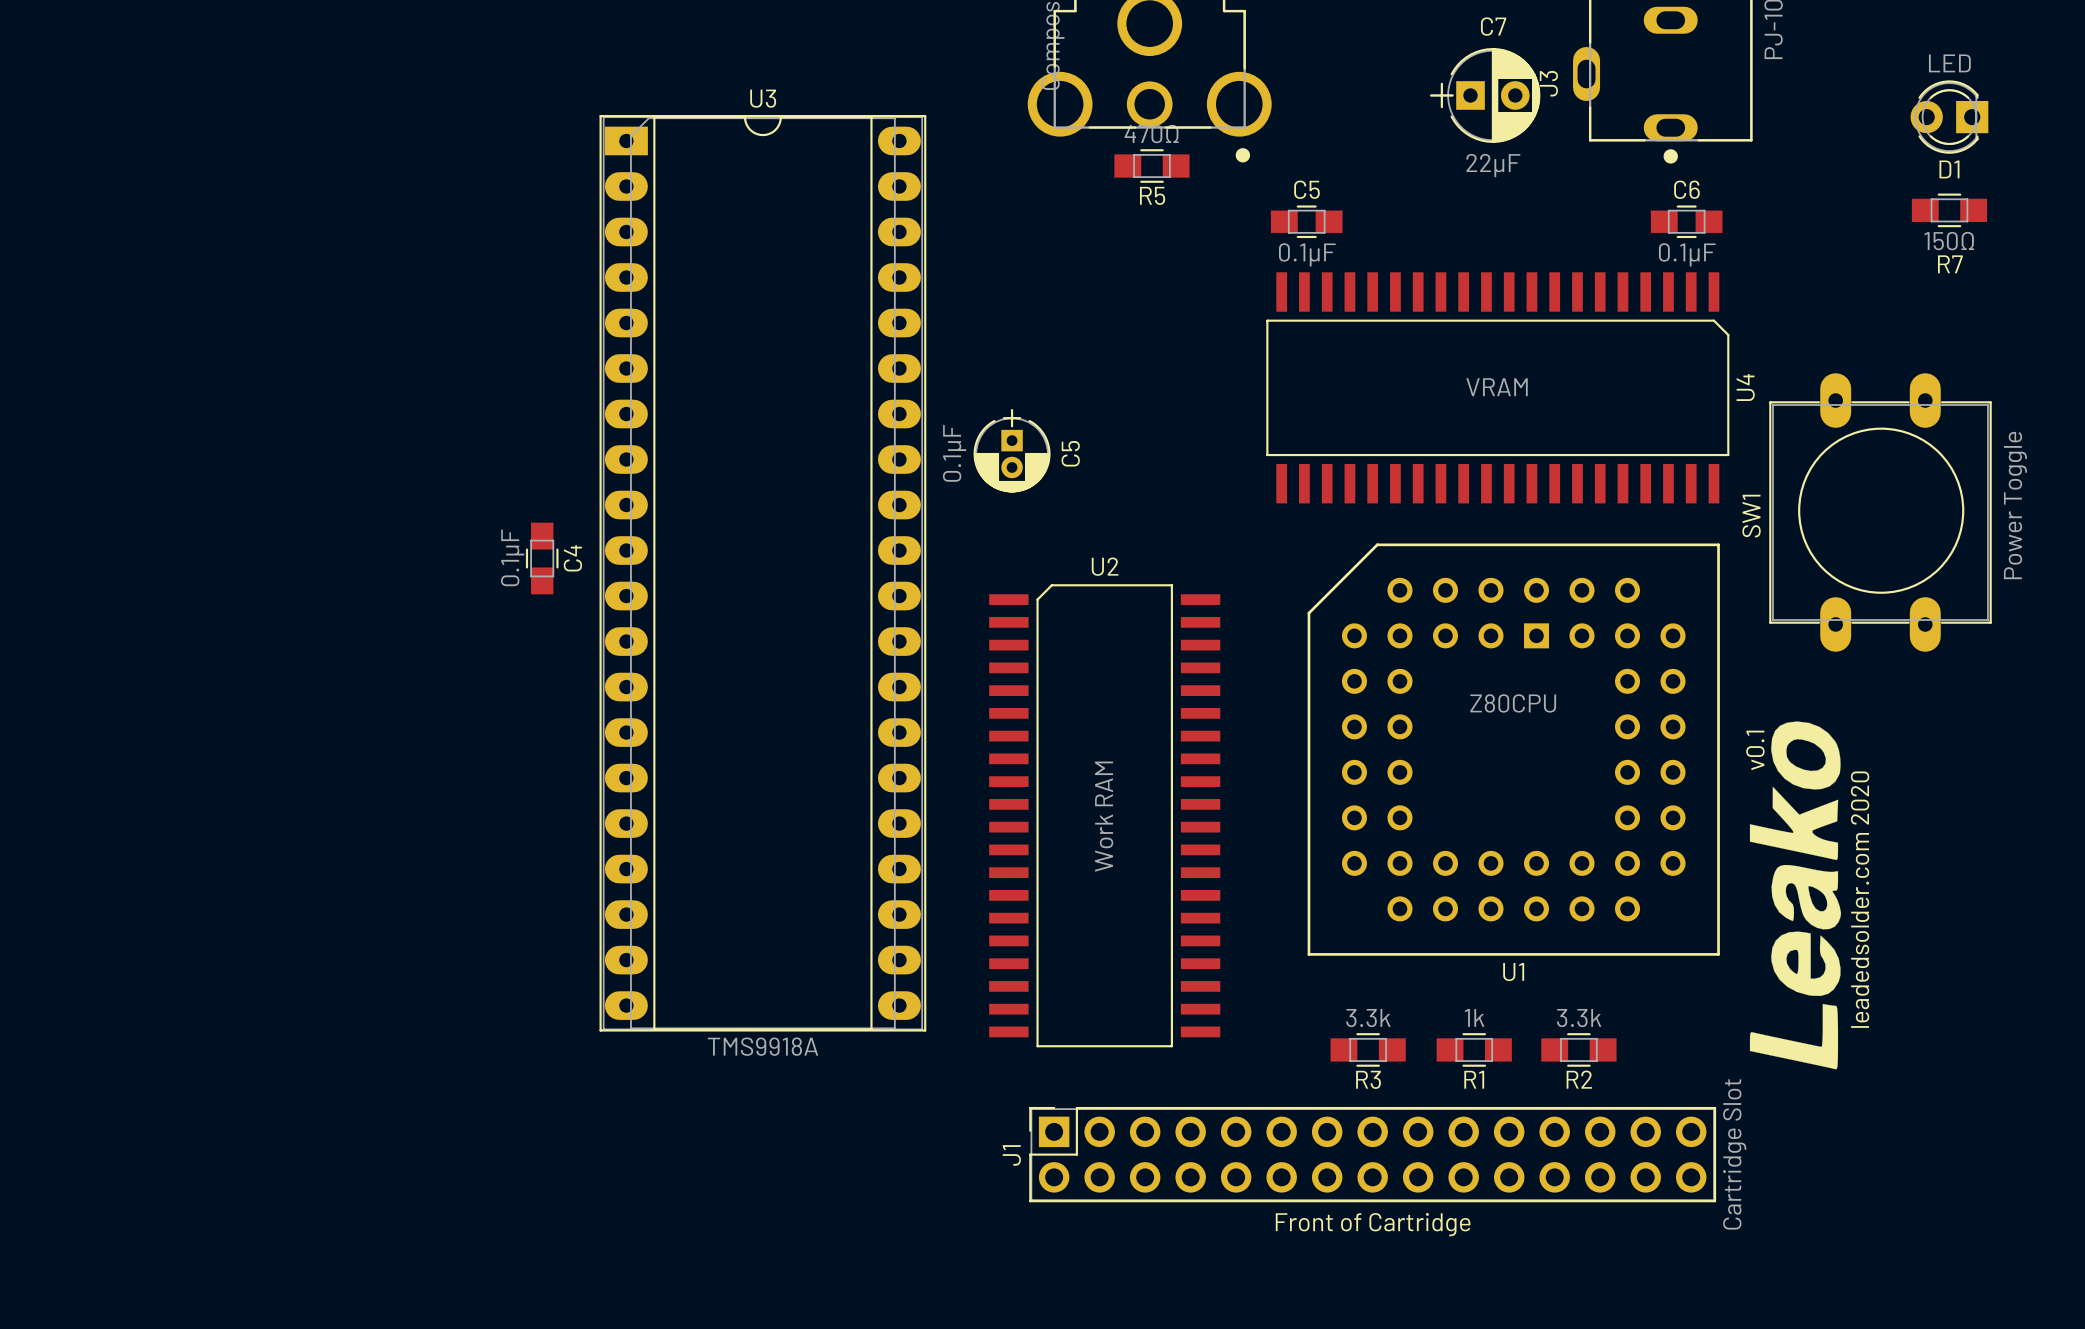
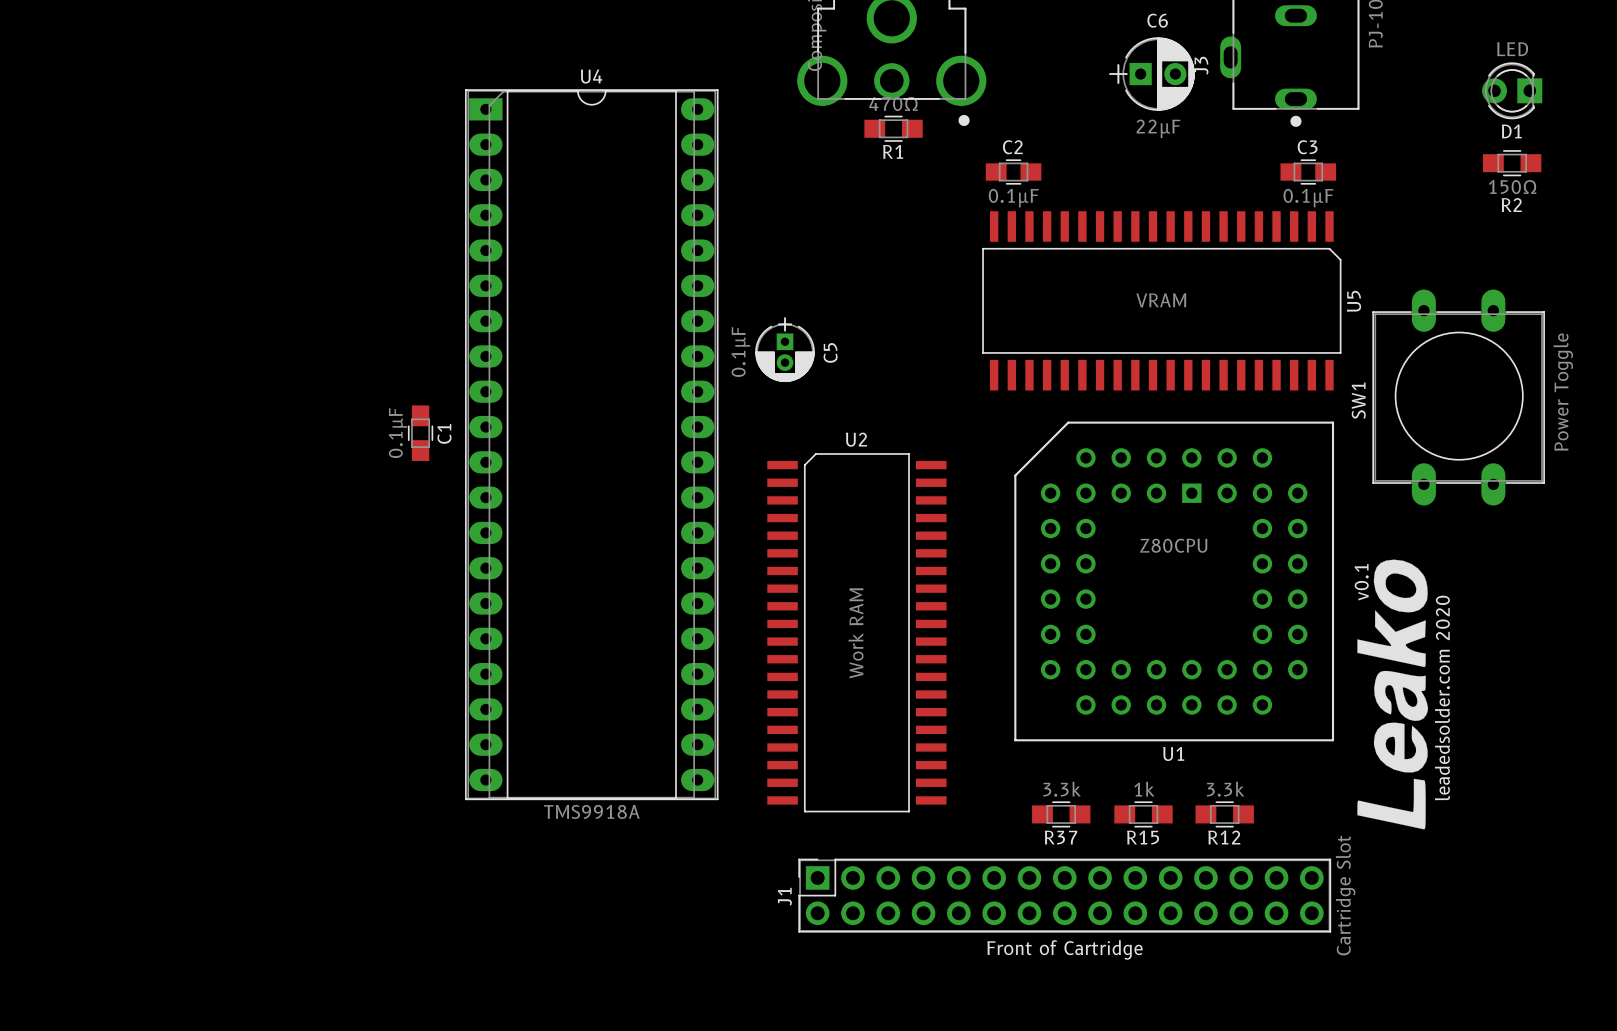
C7 name: C7 (1493, 26) -> C6 (1157, 20)
U3 name: U3 (763, 98) -> U4 (591, 76)
C5 name: C5 (1306, 189) -> C2 (1012, 147)
C6 name: C6 (1686, 189) -> C3 (1307, 147)
R5 name: R5 (1152, 195) -> R1 (893, 151)
R7 name: R7 (1950, 264) -> R2 (1511, 205)
U4 name: U4 (1745, 387) -> U5 (1354, 301)
C4 name: C4 (572, 558) -> C1 (444, 433)
R3 name: R3 (1368, 1079) -> R37 (1061, 837)
R1 name: R1 (1474, 1079) -> R15 (1143, 837)
R2 name: R2 (1579, 1079) -> R12 (1224, 837)

